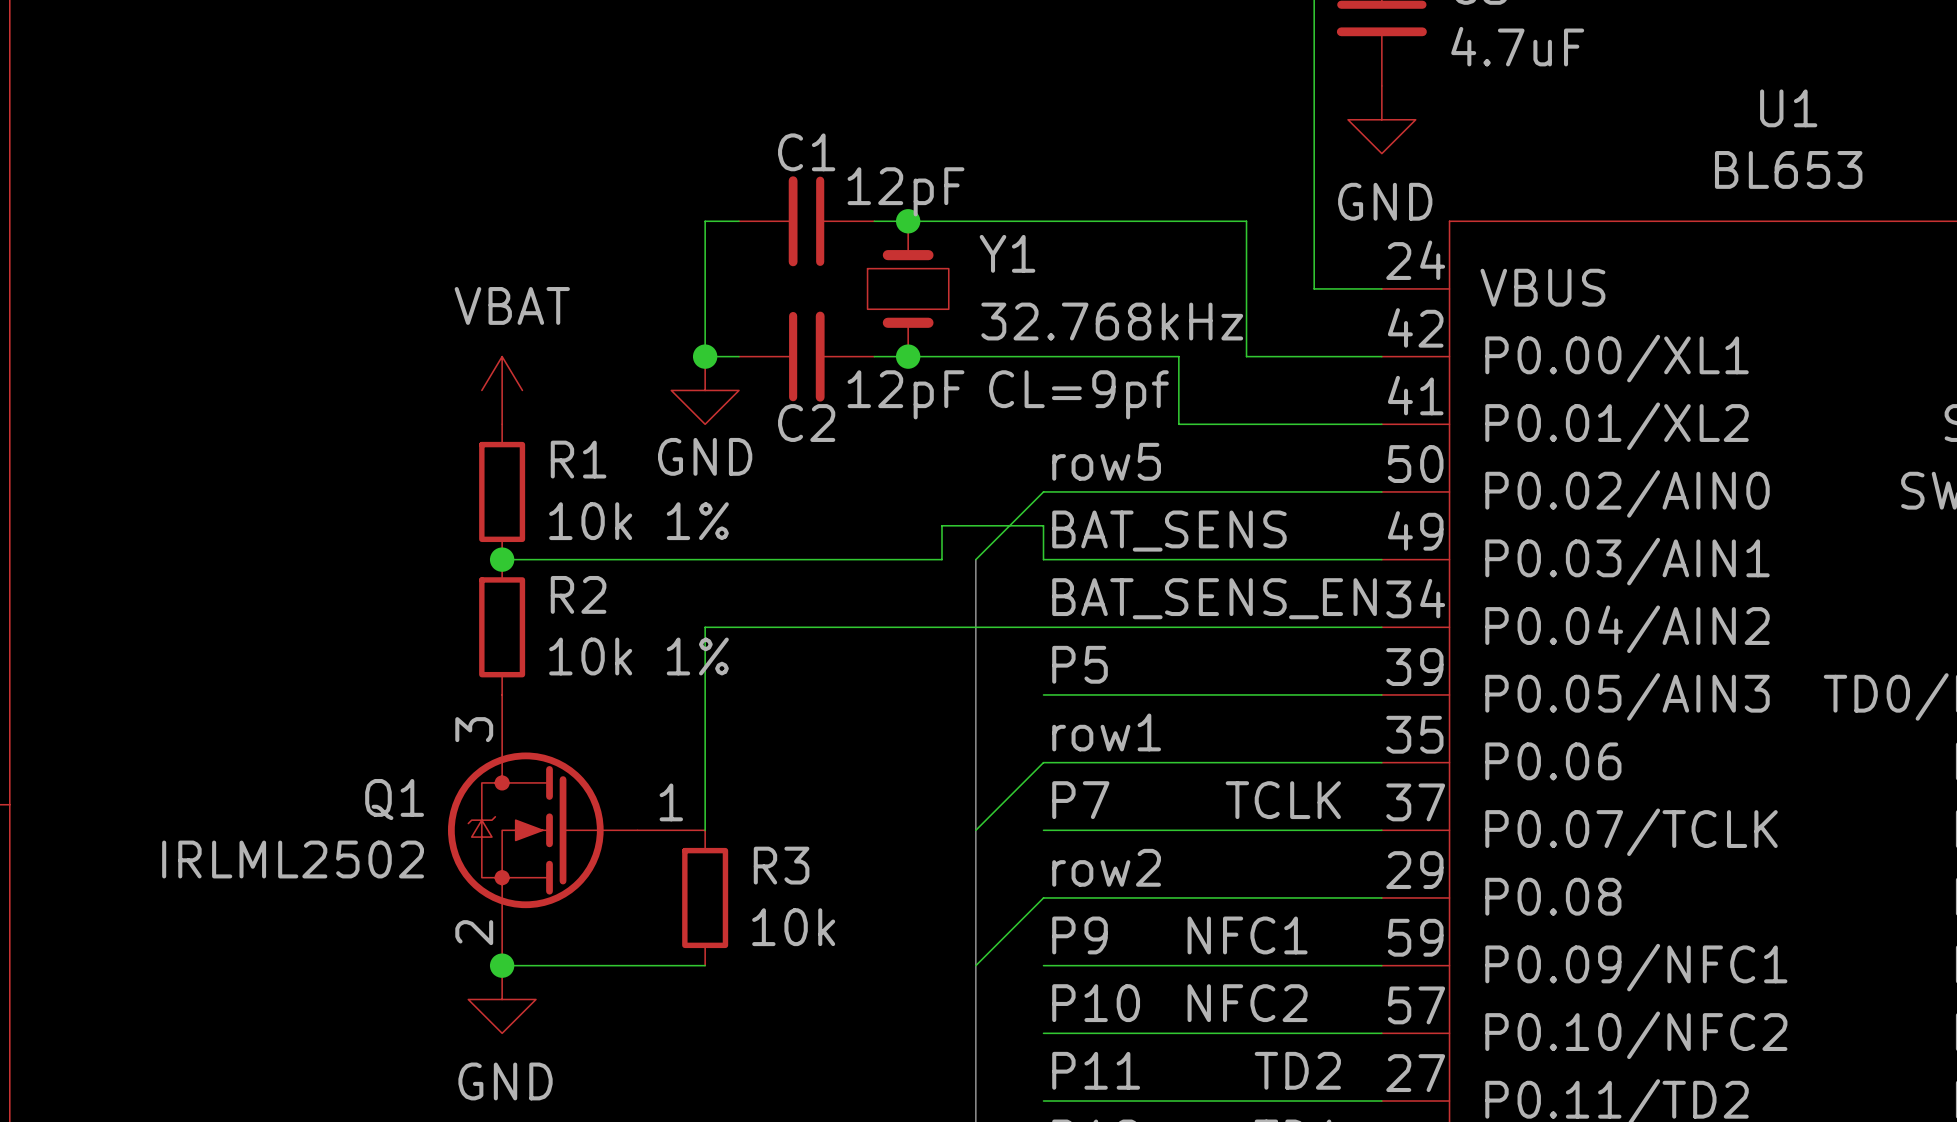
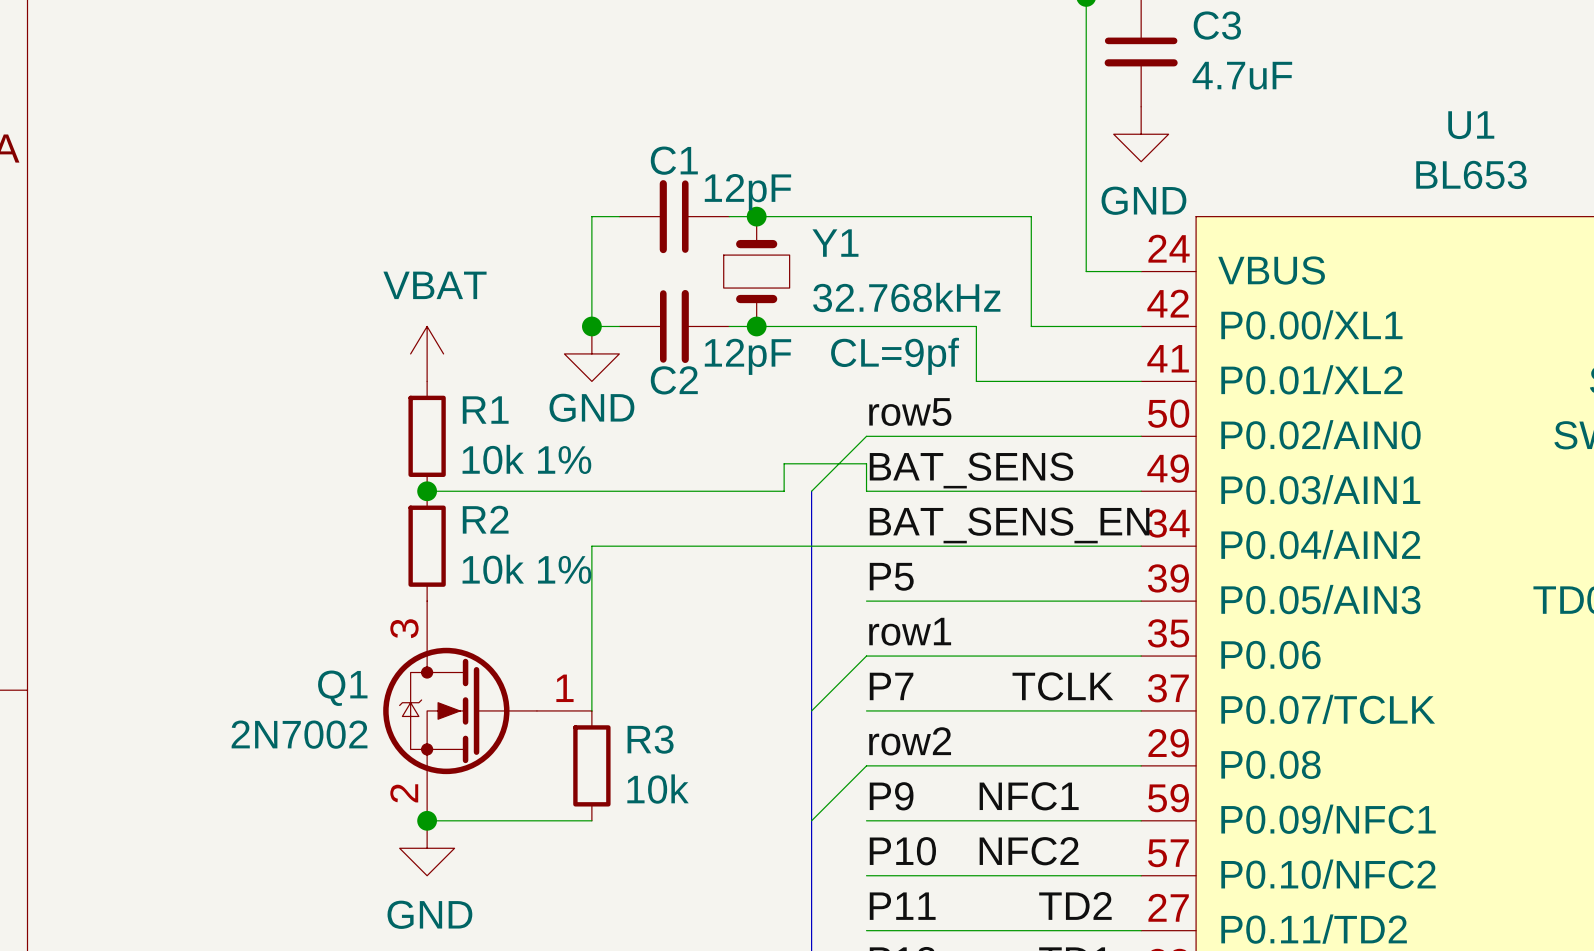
Q1 value: IRLML2502 (293, 859) -> 2N7002 (299, 734)

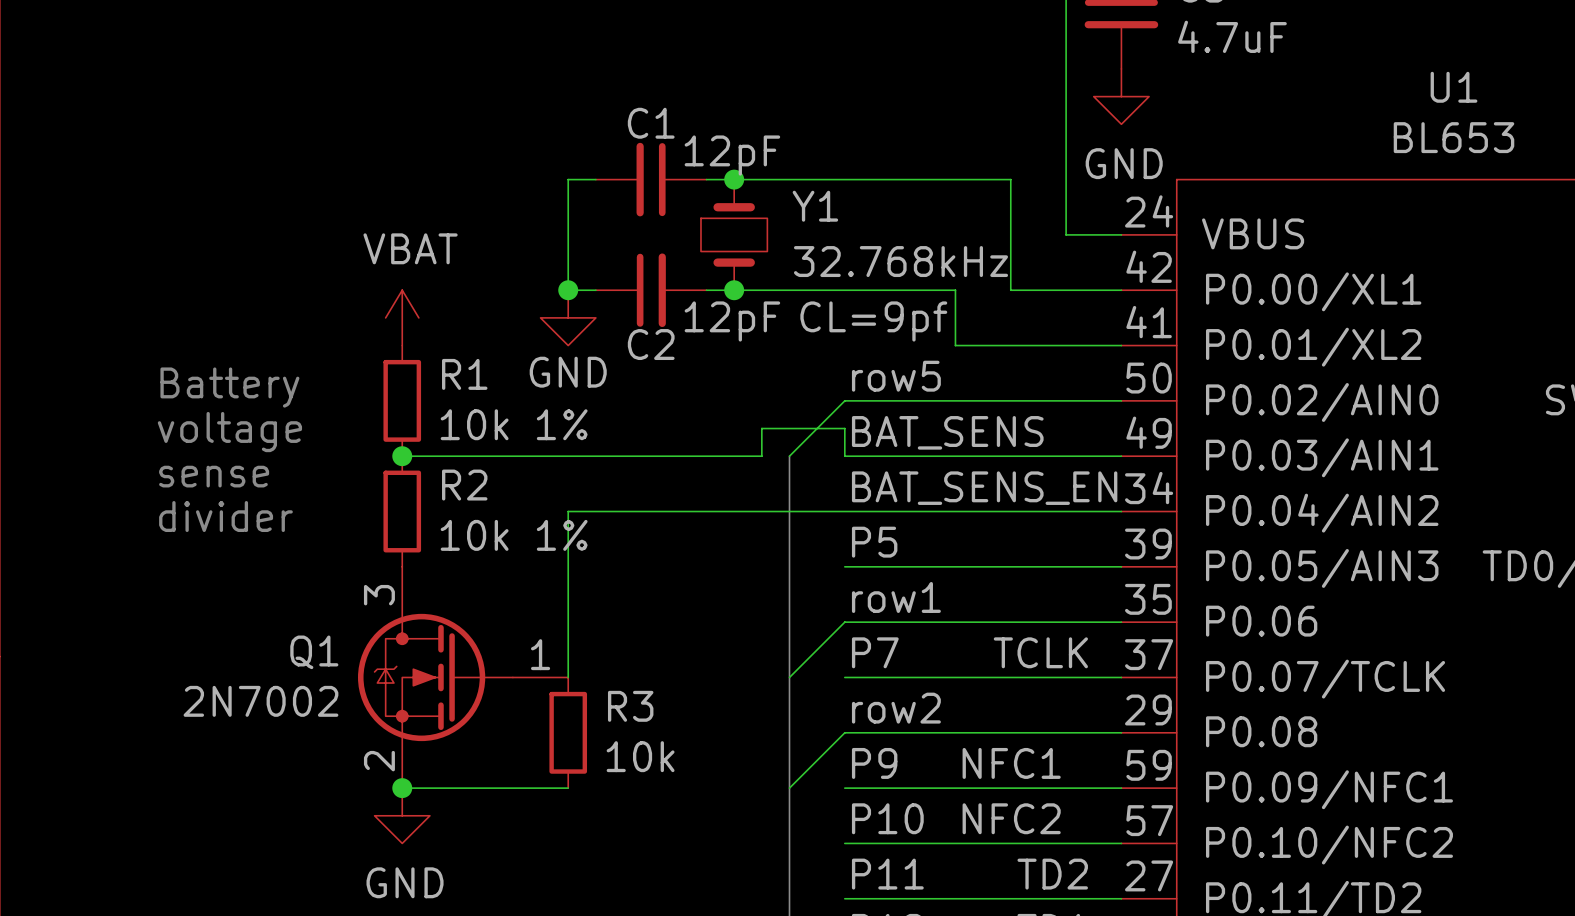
text: none -> Battery (229, 387)
text: none -> voltage (229, 432)
text: none -> sense (214, 476)
text: none -> divider (225, 516)

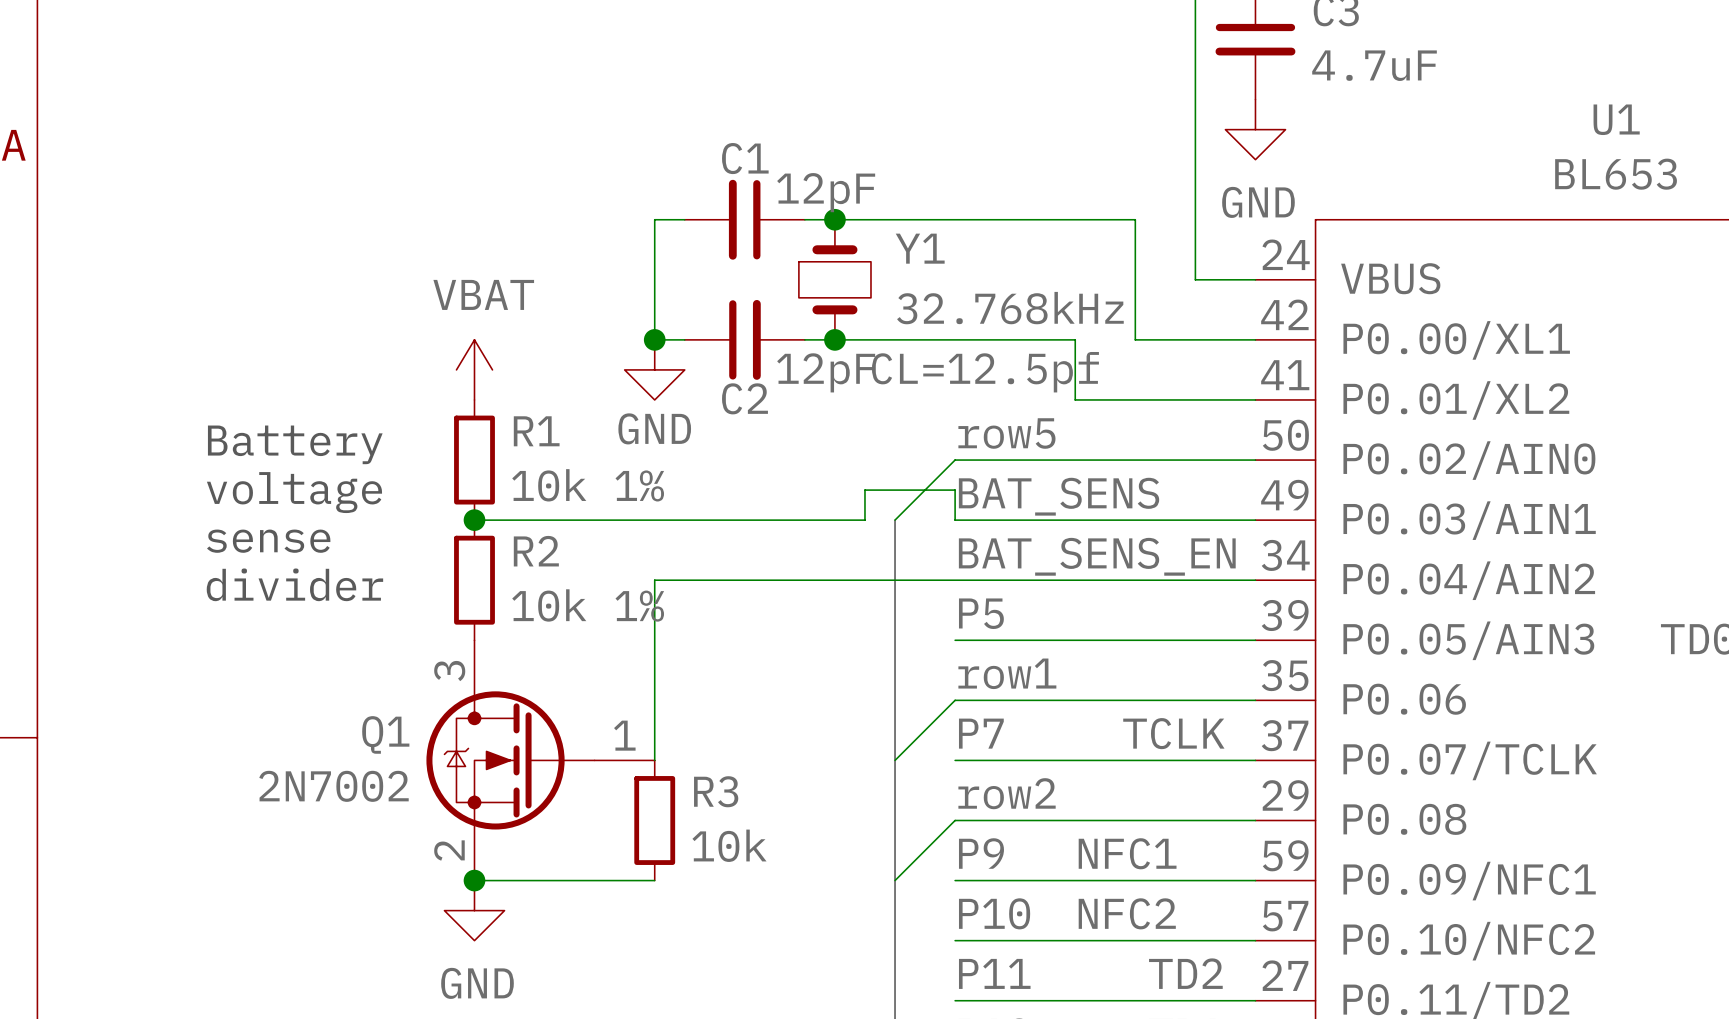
Y1 text: CL=9pf (873, 321) -> CL=12.5pf (985, 372)

